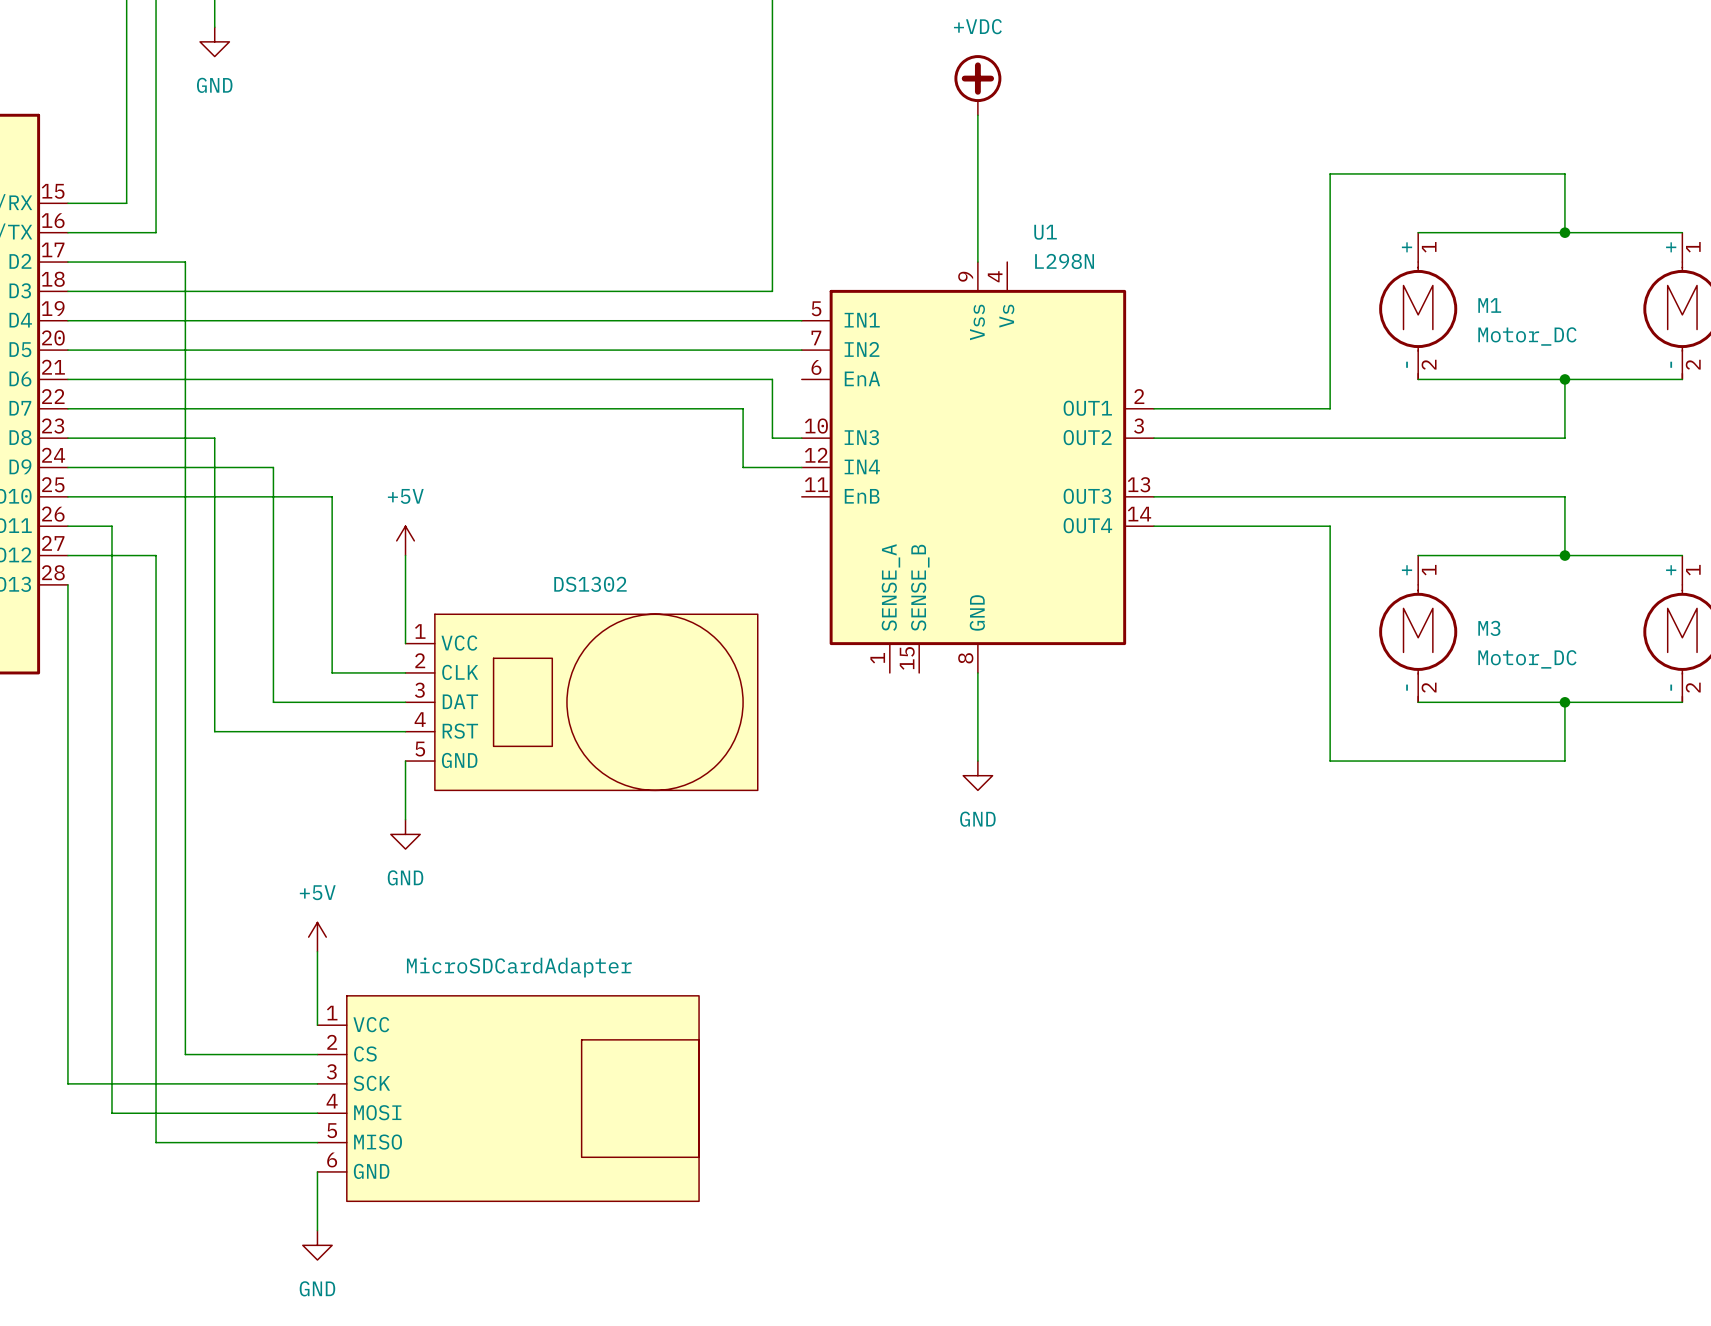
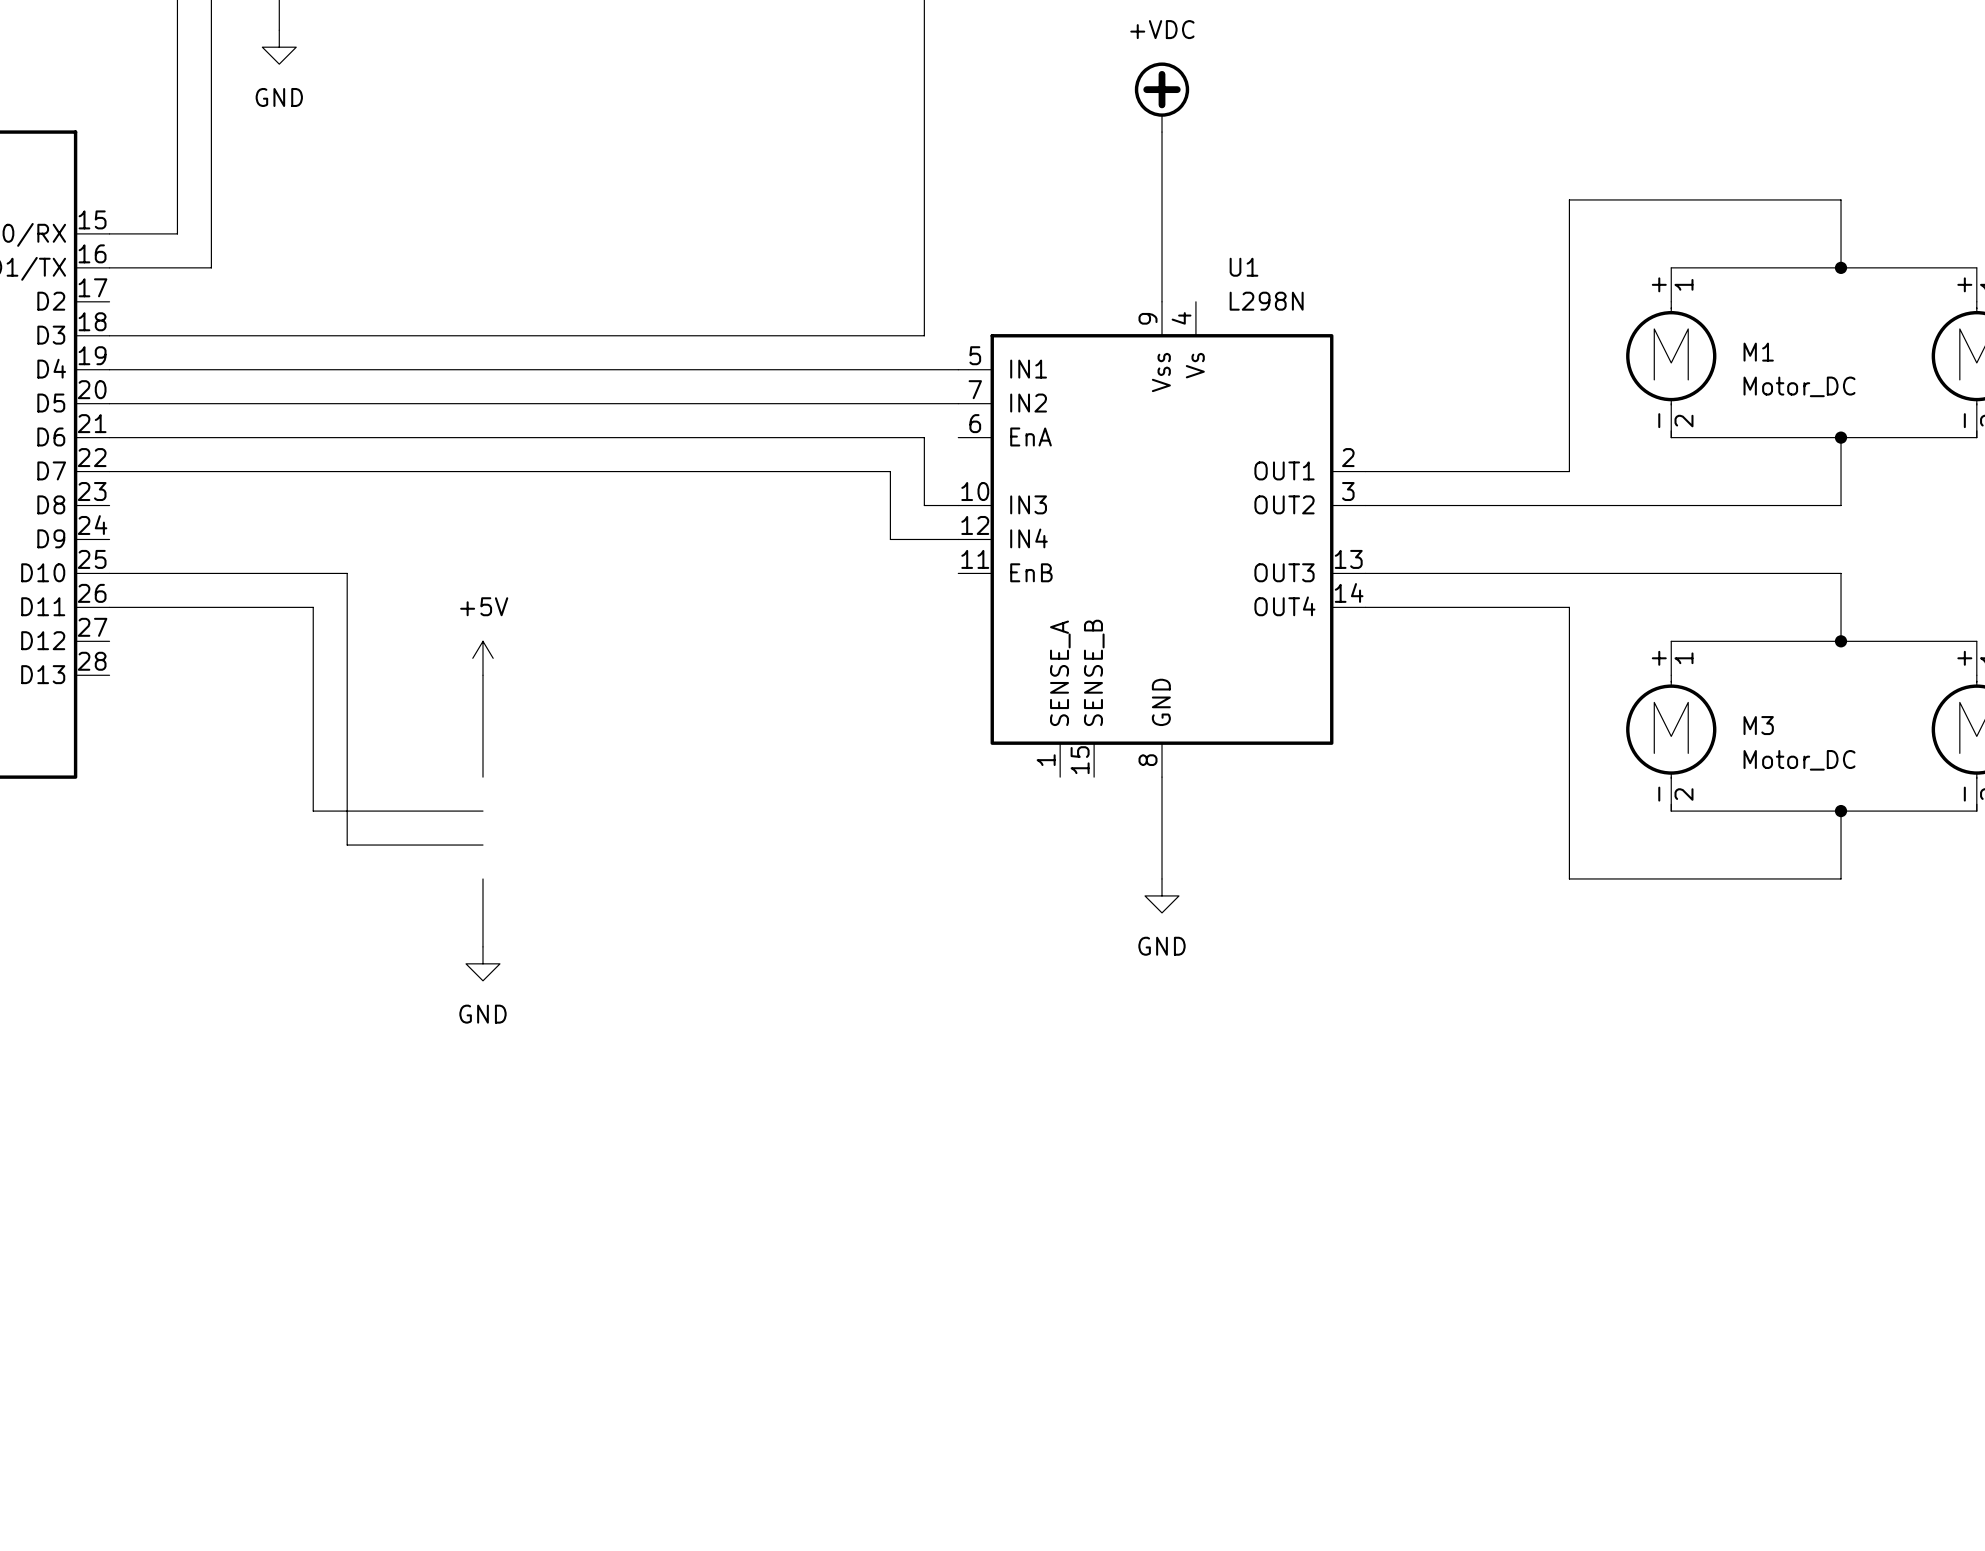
wire: (67, 262) (185, 262) (185, 1054) (317, 1054) -> none
wire: (67, 438) (214, 438) (214, 731) (273, 731) -> (160, 607) (313, 607) (313, 811) (347, 811) (347, 845)
wire: (67, 467) (273, 467) (273, 496) (332, 496) (332, 672) (405, 672) -> none
wire: (111, 526) (111, 1113) (317, 1113) -> none
power symbol position: +5V (405, 540) -> +5V (482, 658)
wire: (67, 555) (156, 555) (156, 1142) (317, 1142) -> none
wire: (405, 555) (405, 643) -> (482, 675) (482, 777)
wire: (67, 584) (67, 1083) (317, 1083) -> none
wire: (390, 702) (405, 702) -> none
DS1302: (581, 702) -> none
wire: (390, 731) (405, 731) -> none
wire: (405, 761) (405, 819) -> (482, 878) (482, 946)
power symbol position: GND (405, 834) -> GND (482, 963)
power symbol: +5V (317, 937) -> none
wire: (317, 951) (317, 1025) -> none
MicroSDCardAdapter: (508, 1098) -> none
wire: (317, 1171) (317, 1230) -> none
power symbol: GND (317, 1245) -> none

